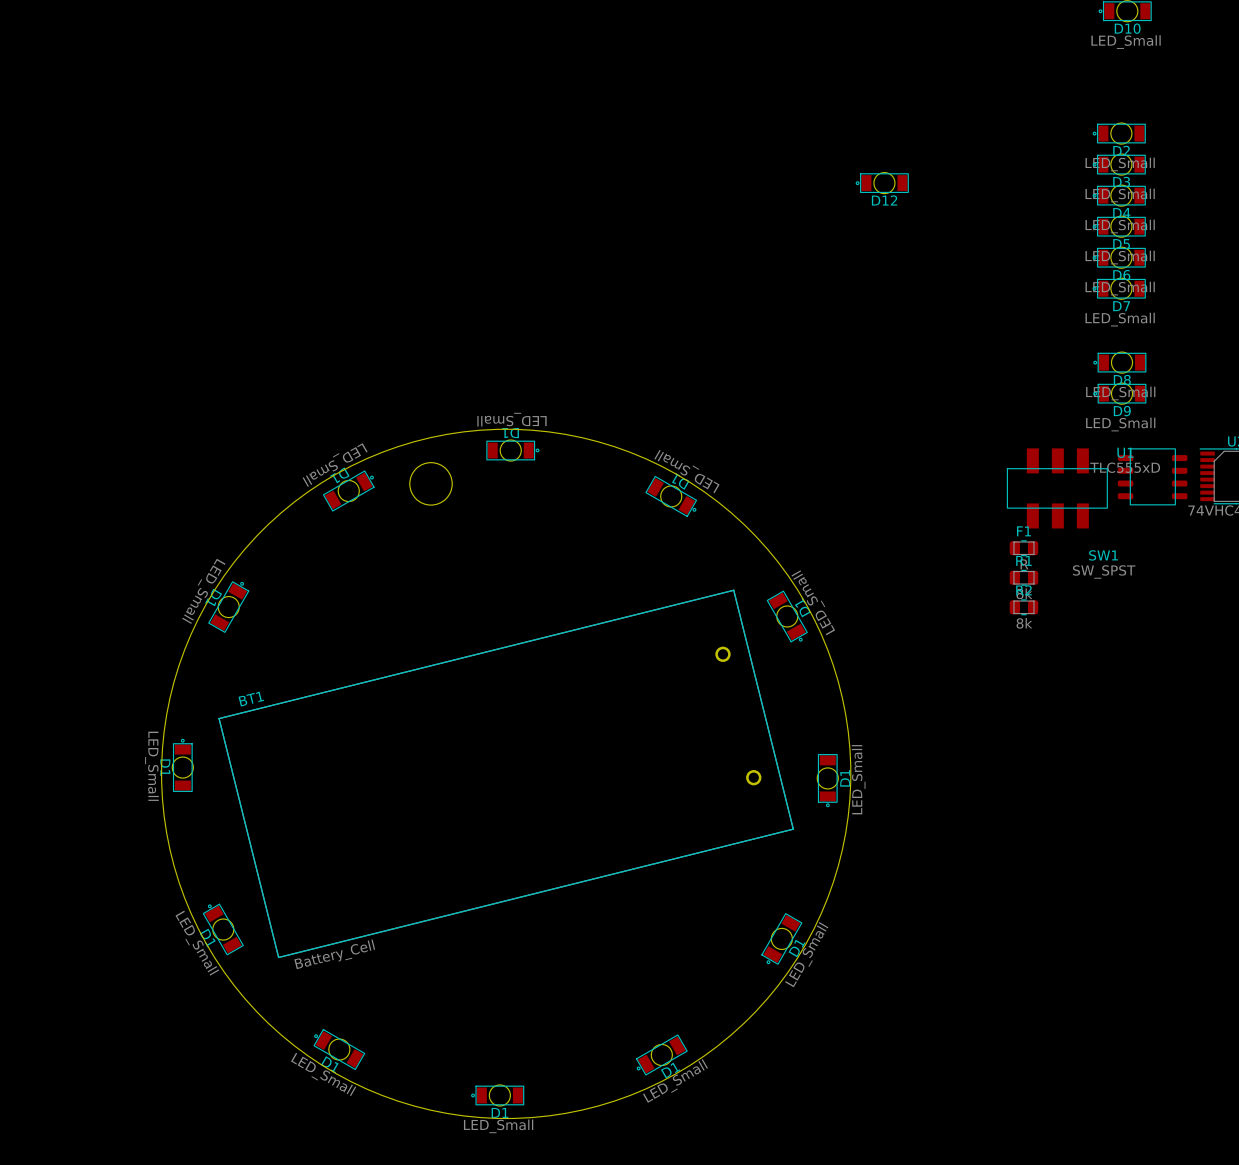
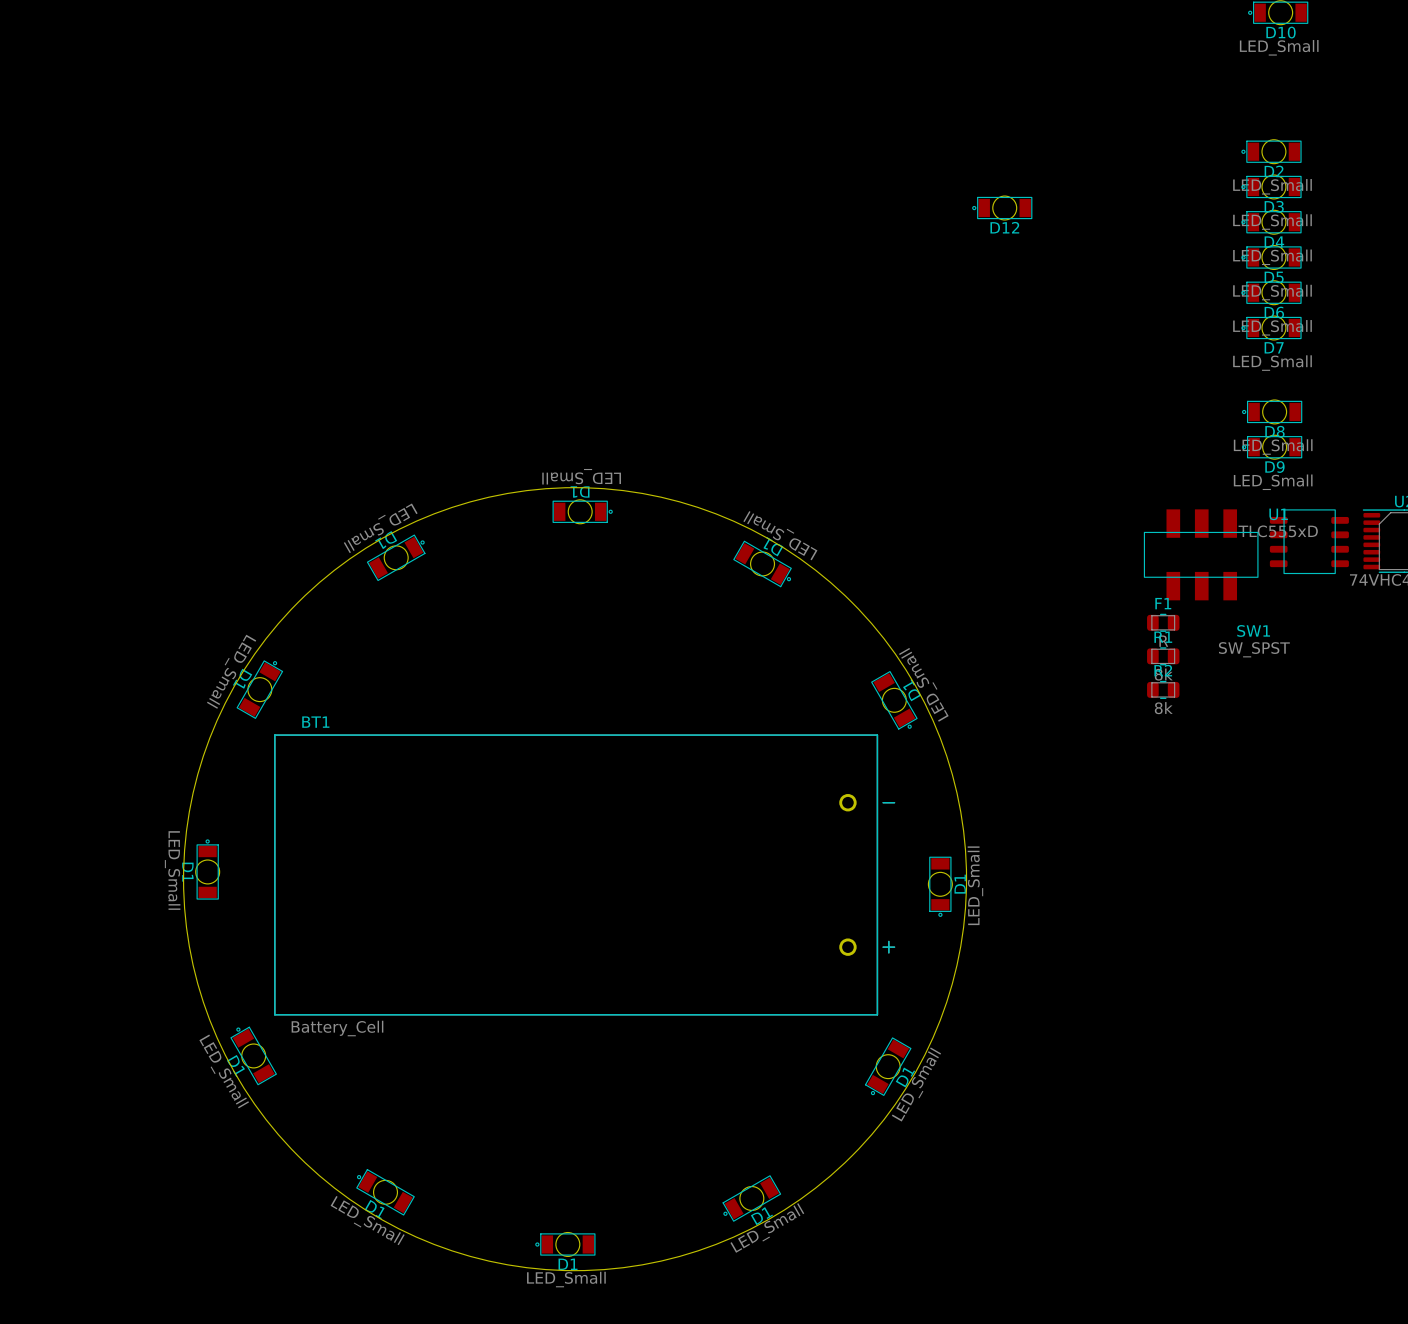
round board edge: [409, 462, 453, 506] -> none
BT1 footprint: [218, 589, 794, 959] -> [274, 734, 896, 1016]
BT1 name position: BT1 (251, 699) -> BT1 (315, 722)
BT1 value position: Battery_Cell (334, 954) -> Battery_Cell (337, 1028)

